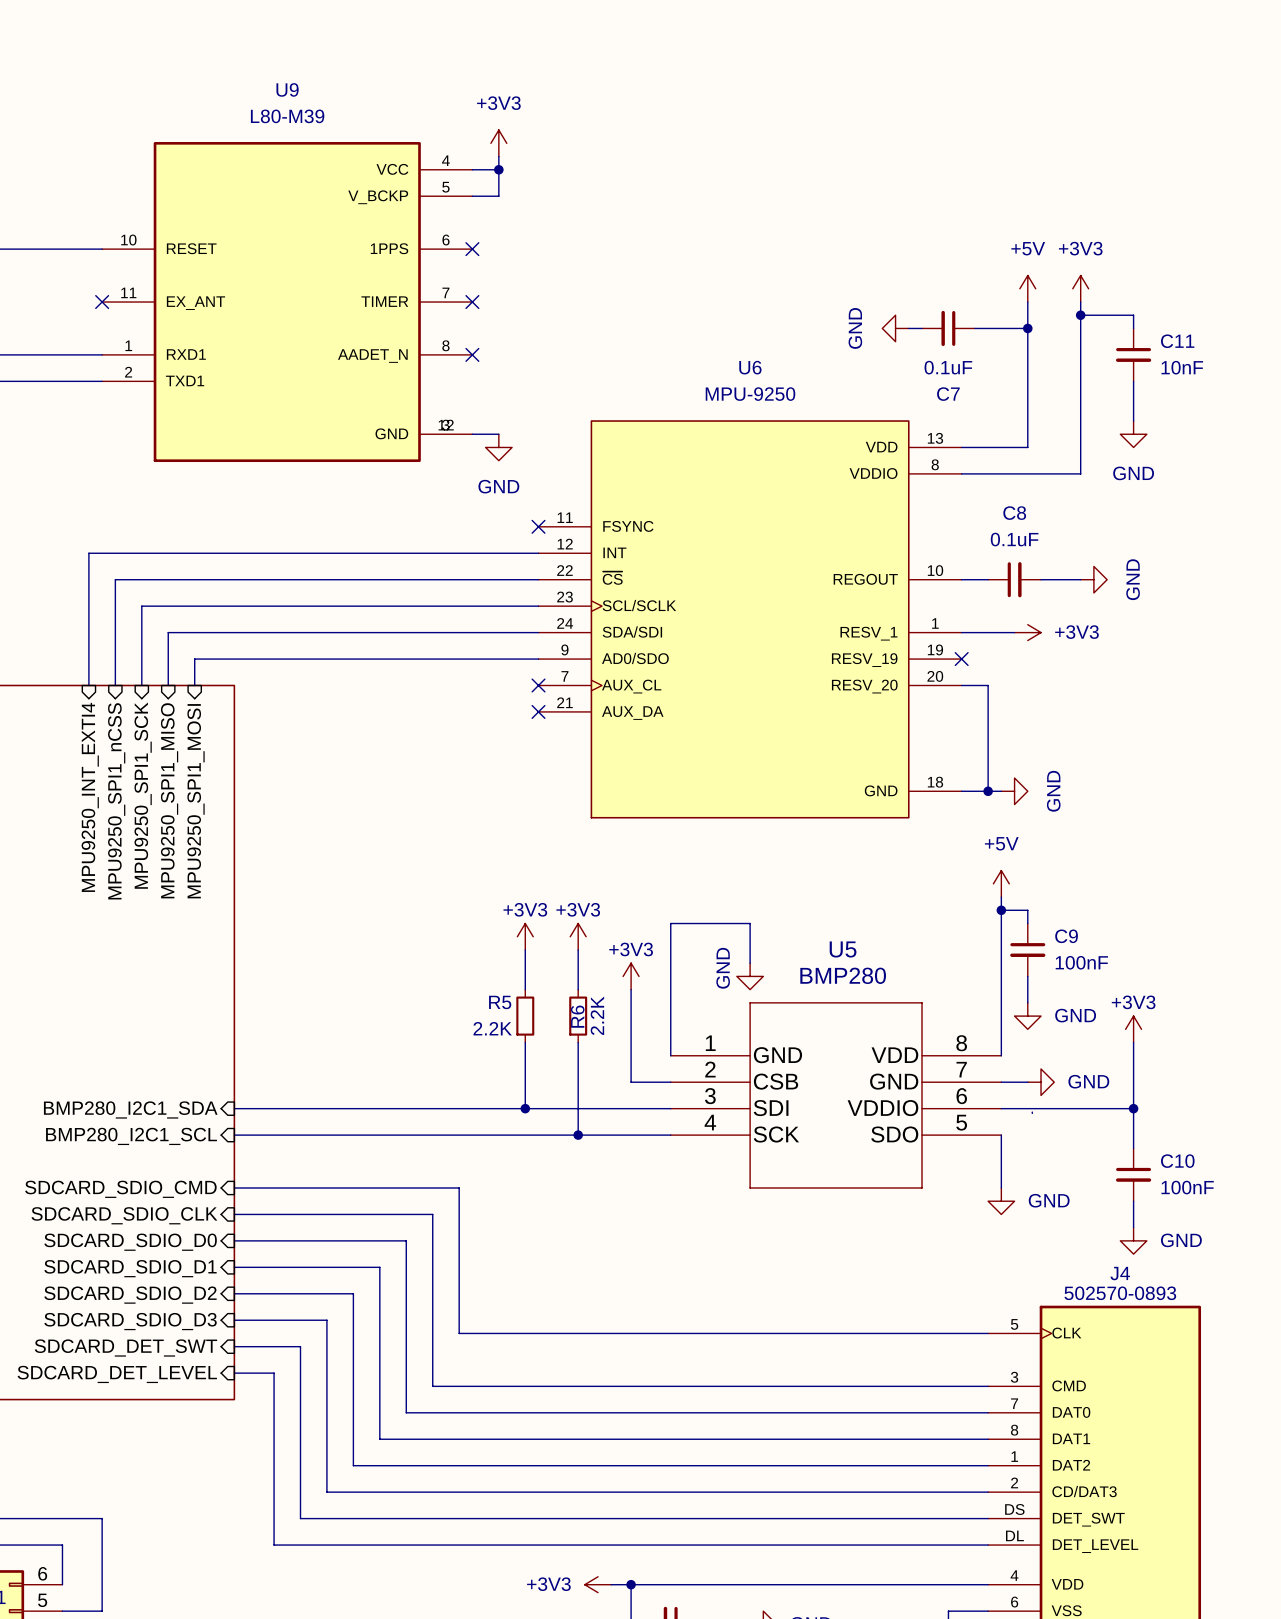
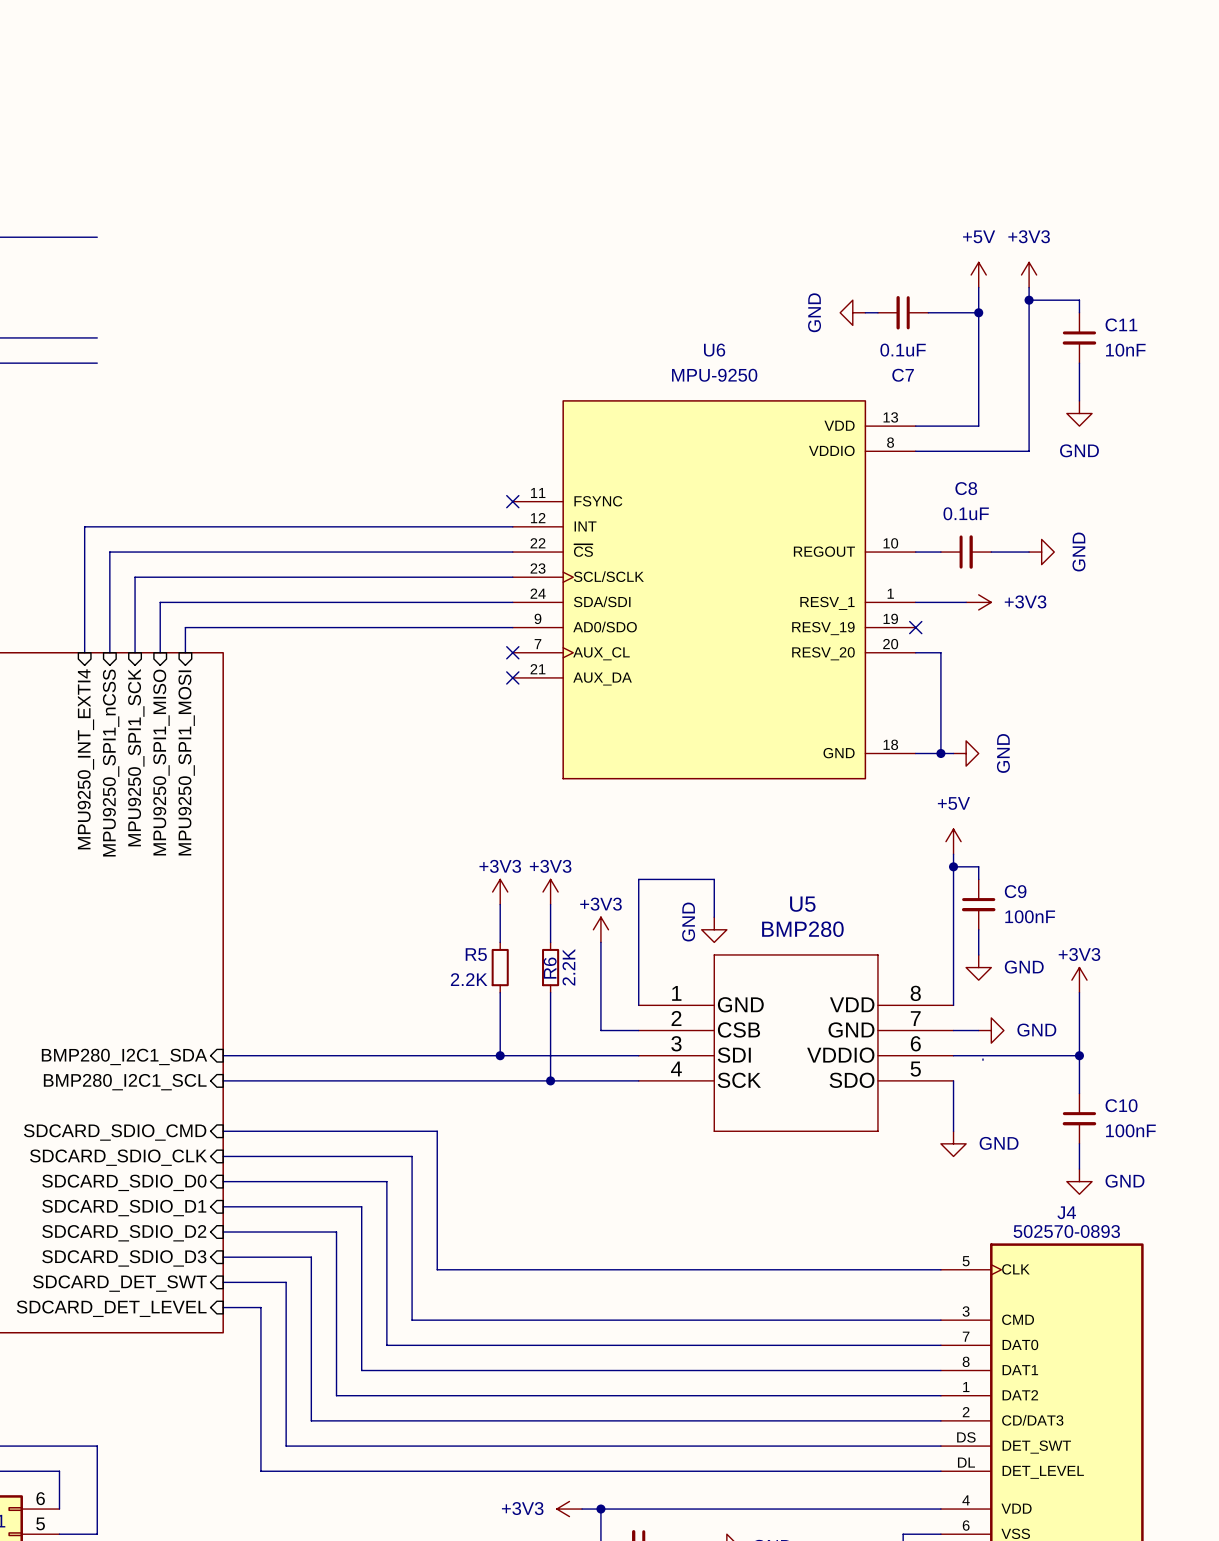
power symbol: +3V3 (498, 143) -> none
wire: (498, 156) (498, 196) (472, 196) -> none
wire: (472, 169) (498, 169) -> none
junction: (498, 169) -> none
no-connect mark: (472, 249) -> none
no-connect mark: (102, 302) -> none
U9: L80-M39 (287, 302) -> none
no-connect mark: (472, 302) -> none
no-connect mark: (472, 354) -> none
wire: (472, 434) (498, 434) -> none
power symbol: GND (498, 447) -> none

